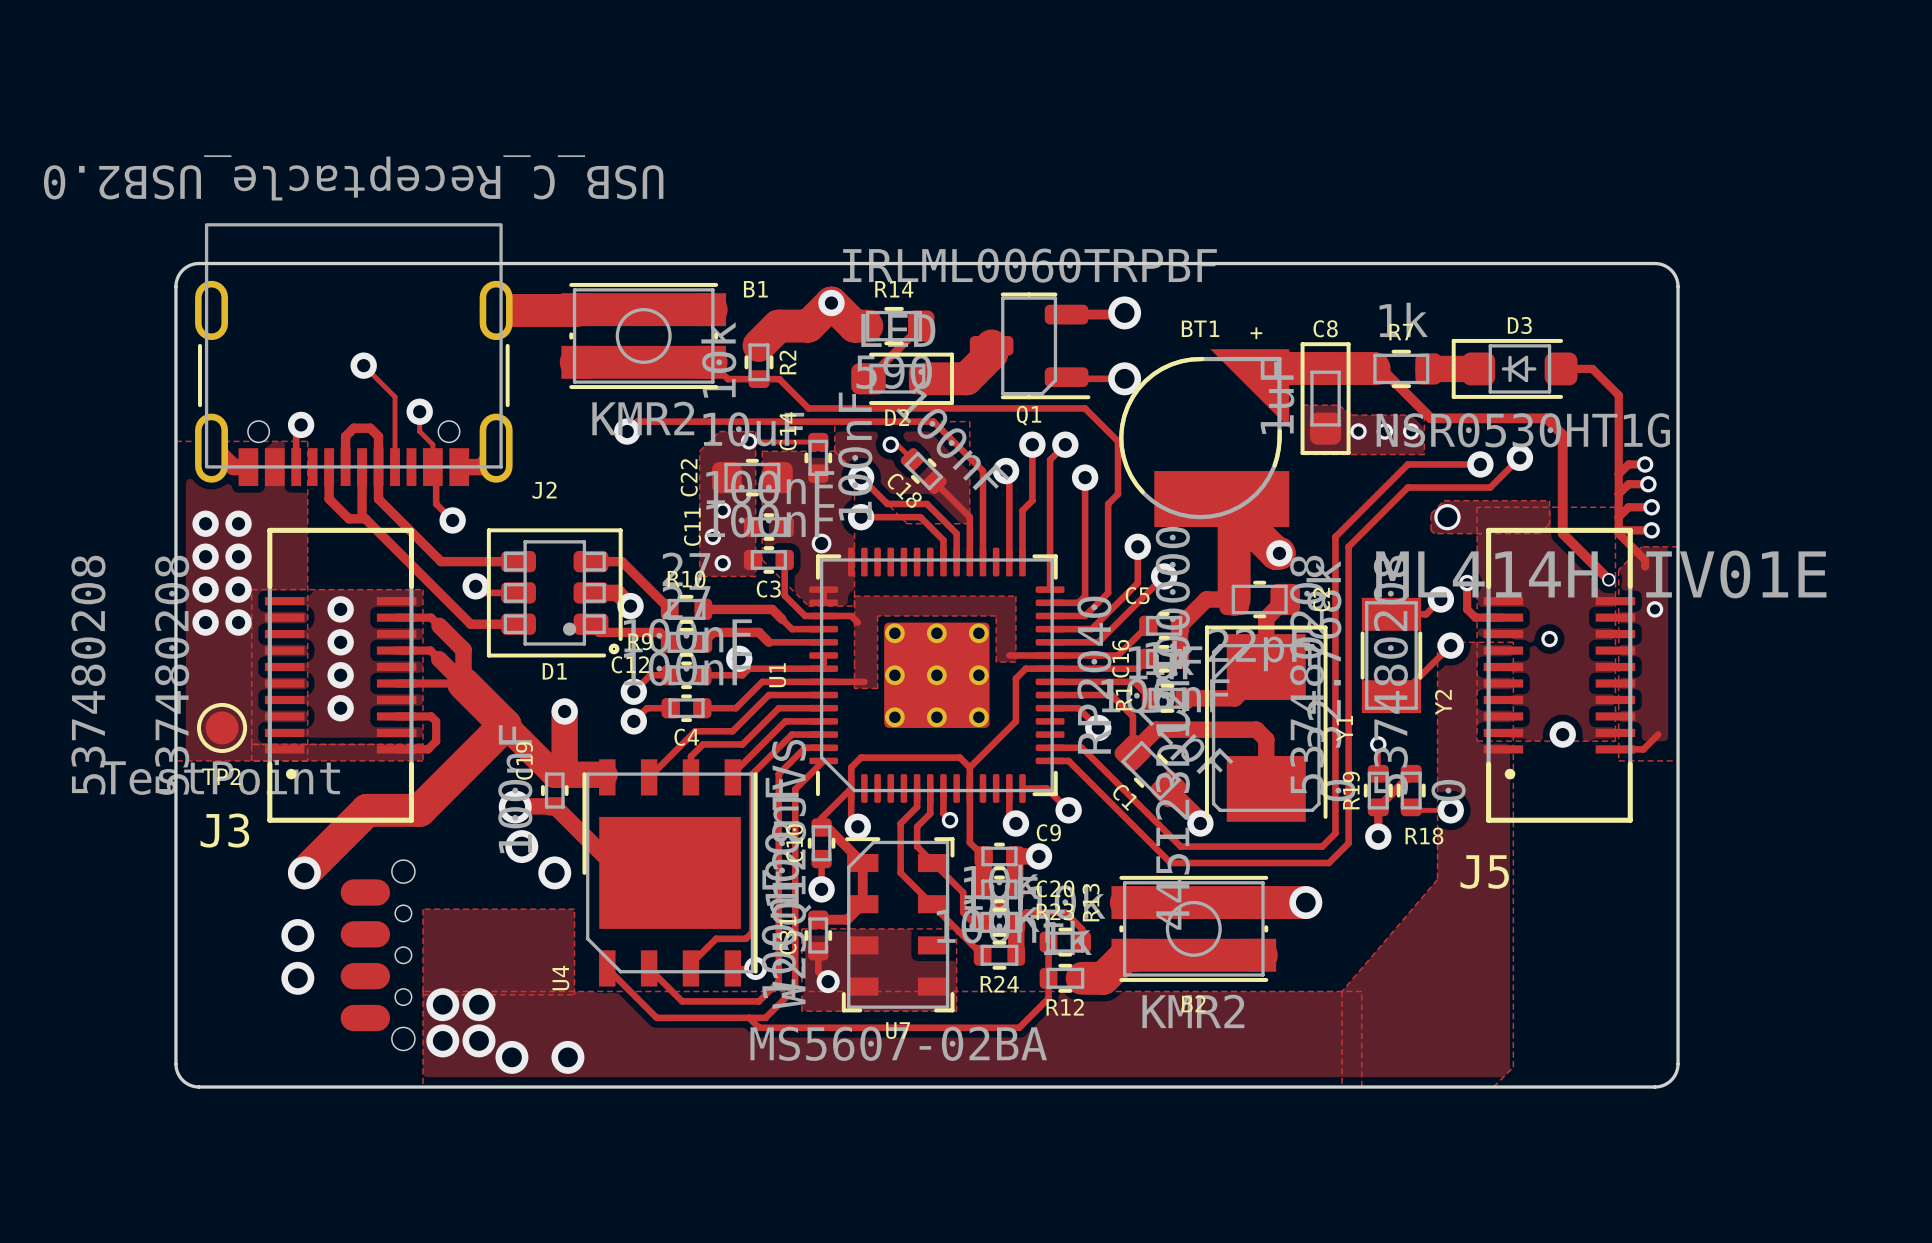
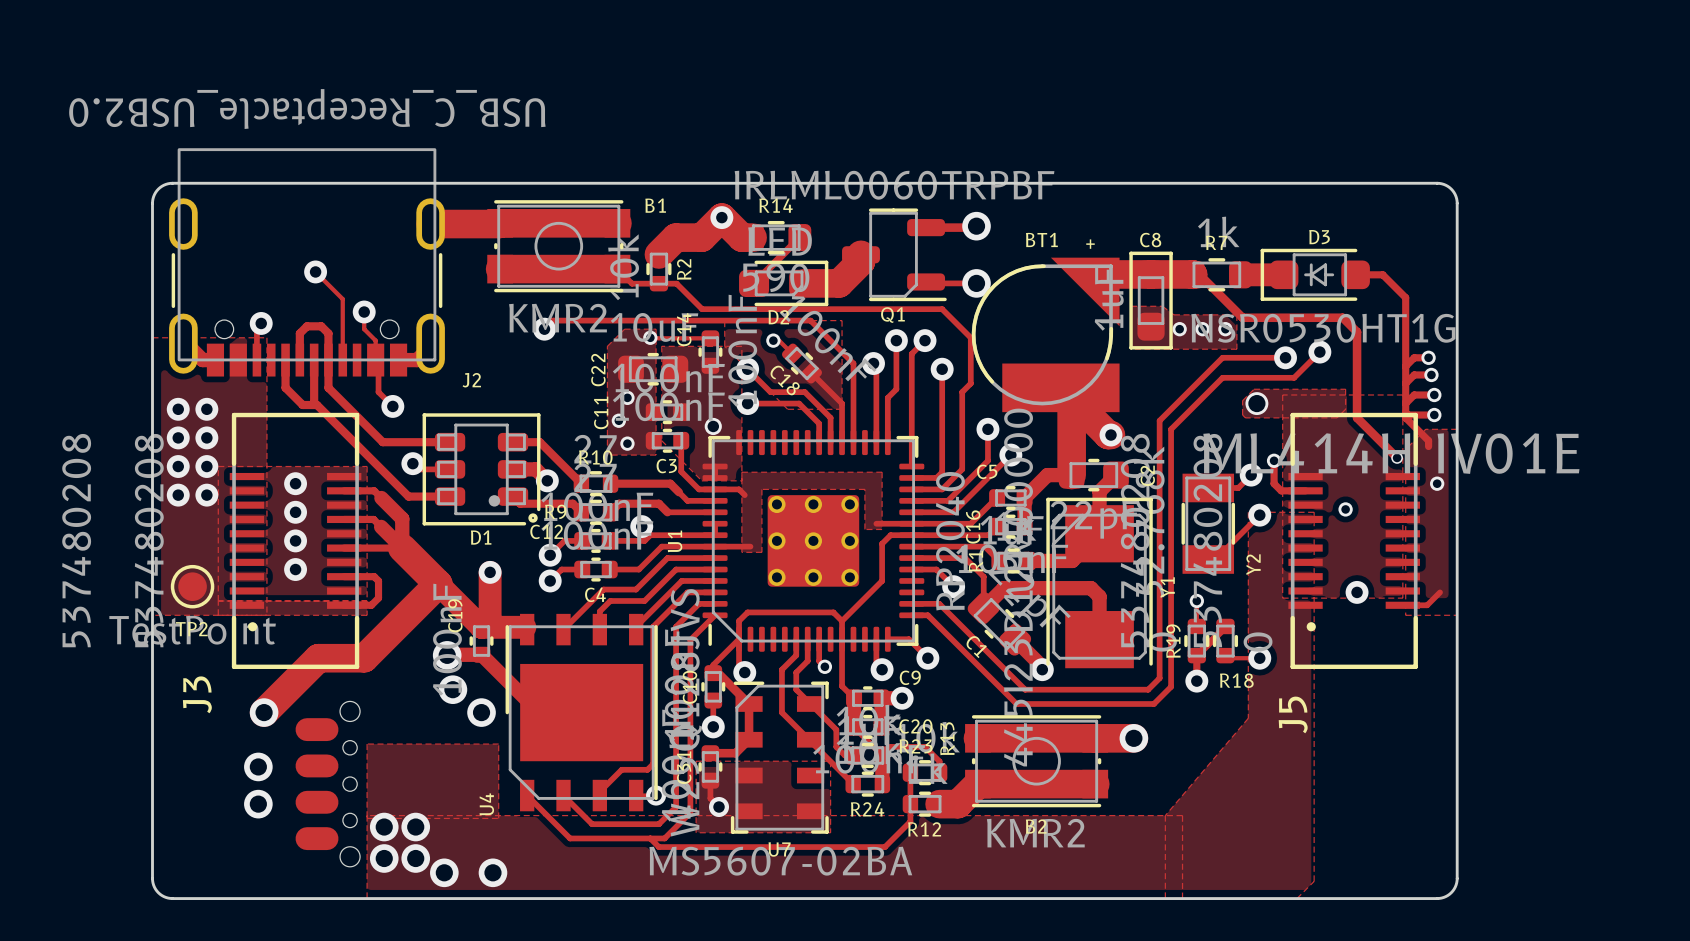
J3 name rotation: 0° (224, 830) -> 90° counterclockwise (197, 694)
J5 name rotation: 0° (1484, 872) -> 90° counterclockwise (1293, 714)

